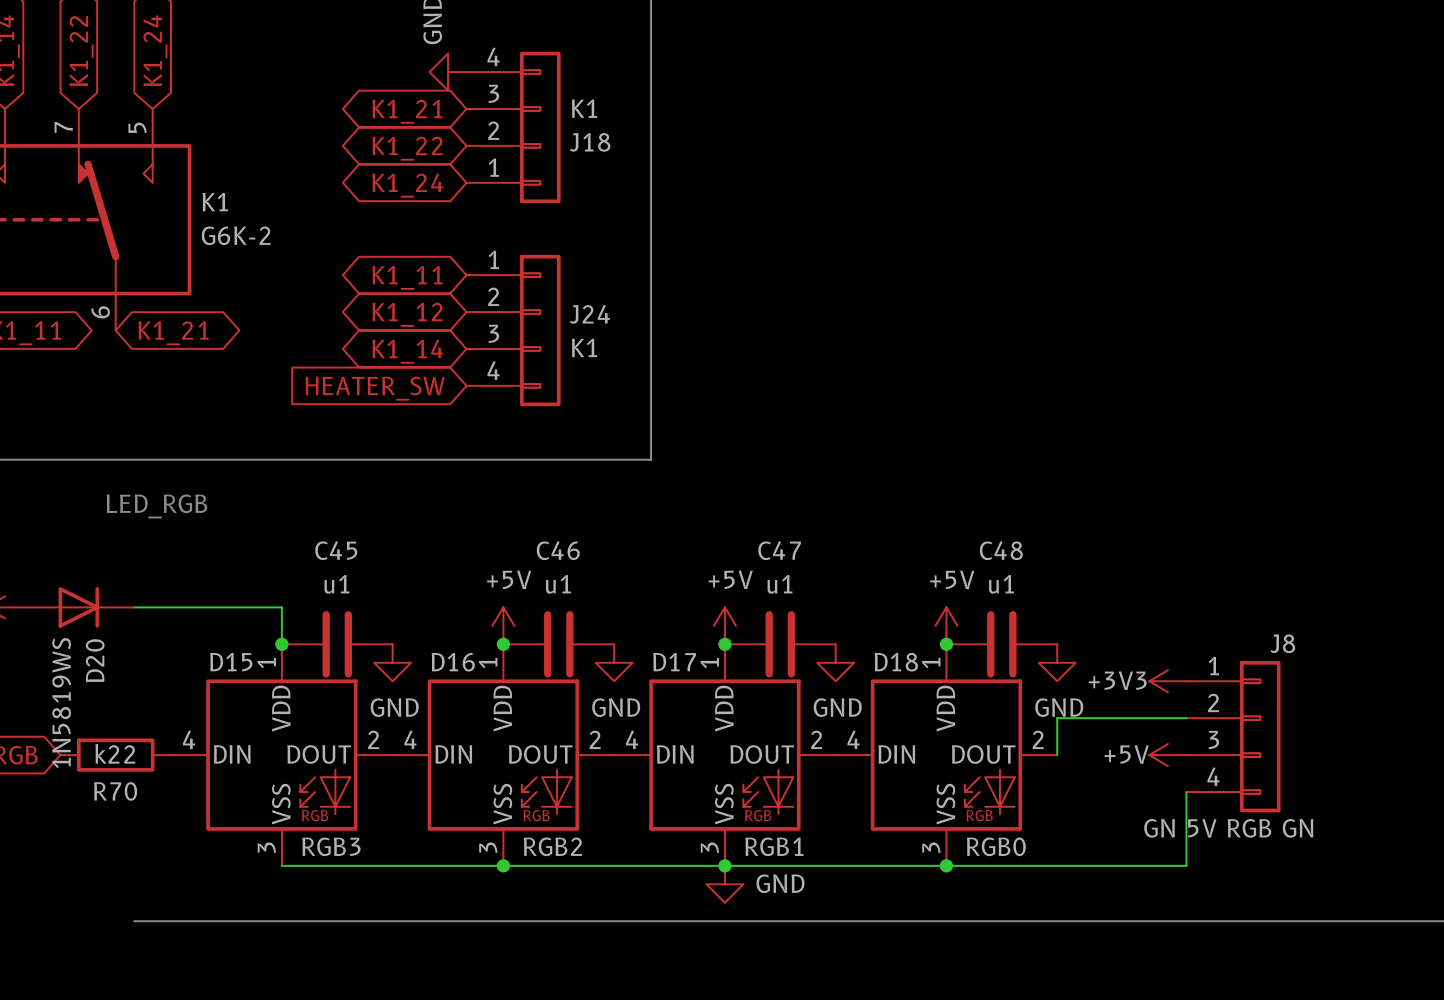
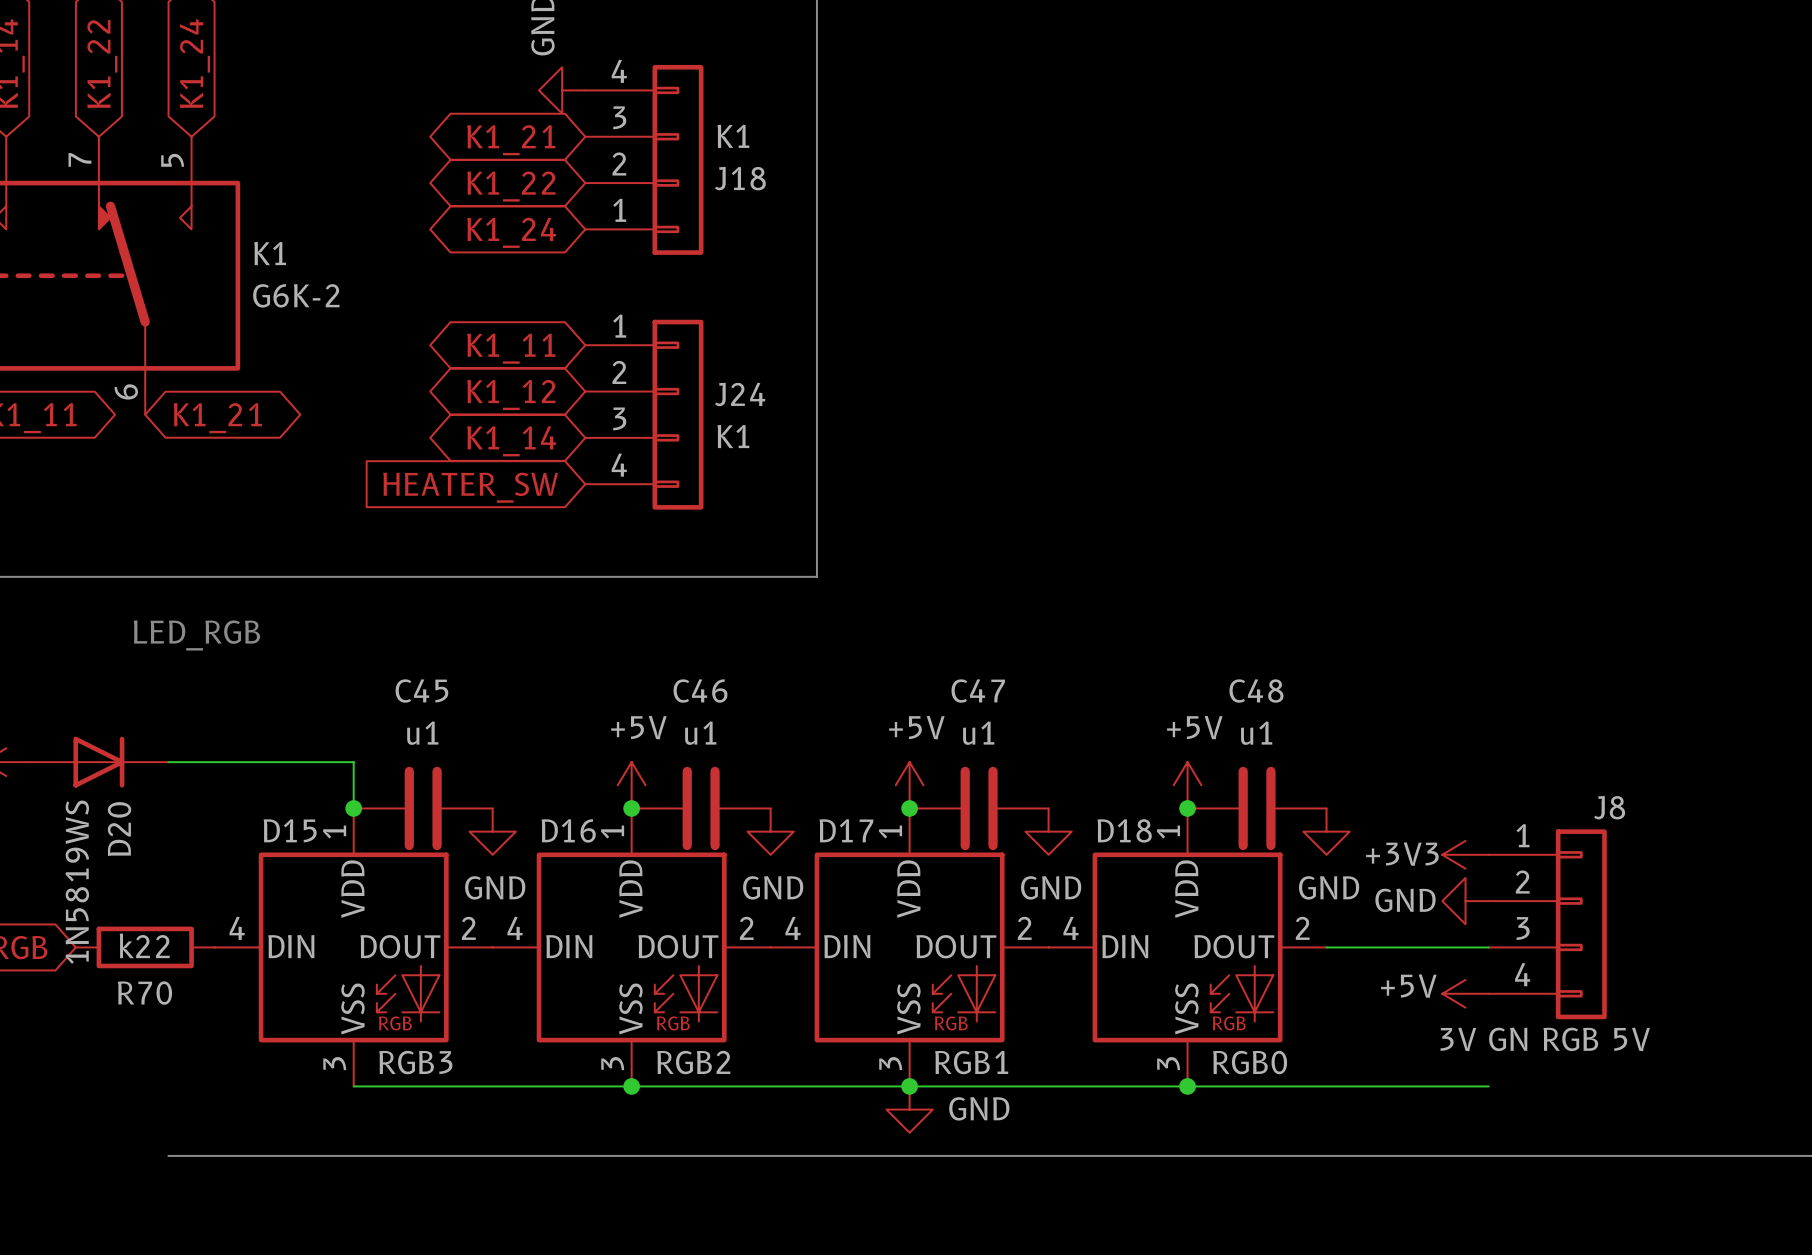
power symbol: none -> GND (1465, 901)
wire: (1186, 718) (1057, 718) (1057, 755) -> (1488, 947) (1326, 947)
power symbol text position: +5V (1126, 754) -> +5V (1408, 986)
power symbol position: +5V (1167, 755) -> +5V (1465, 993)
wire: (1186, 792) (1186, 865) -> none
J8 value: GN 5V RGB GN (1228, 828) -> 3V GN RGB 5V (1545, 1039)

